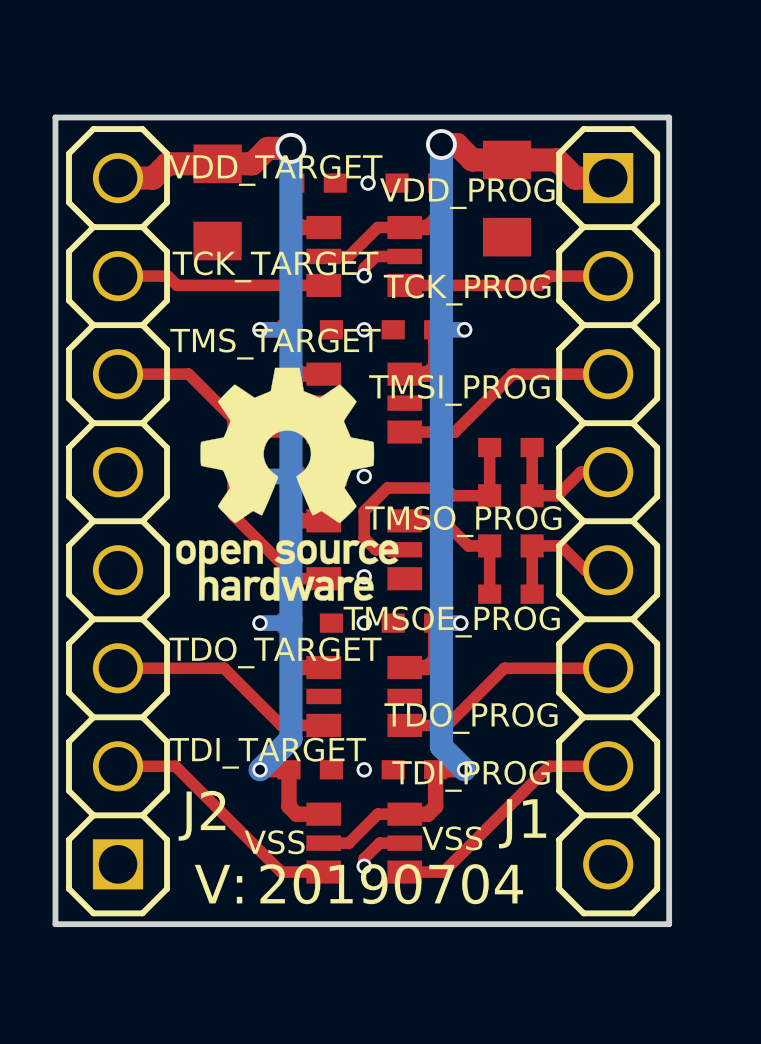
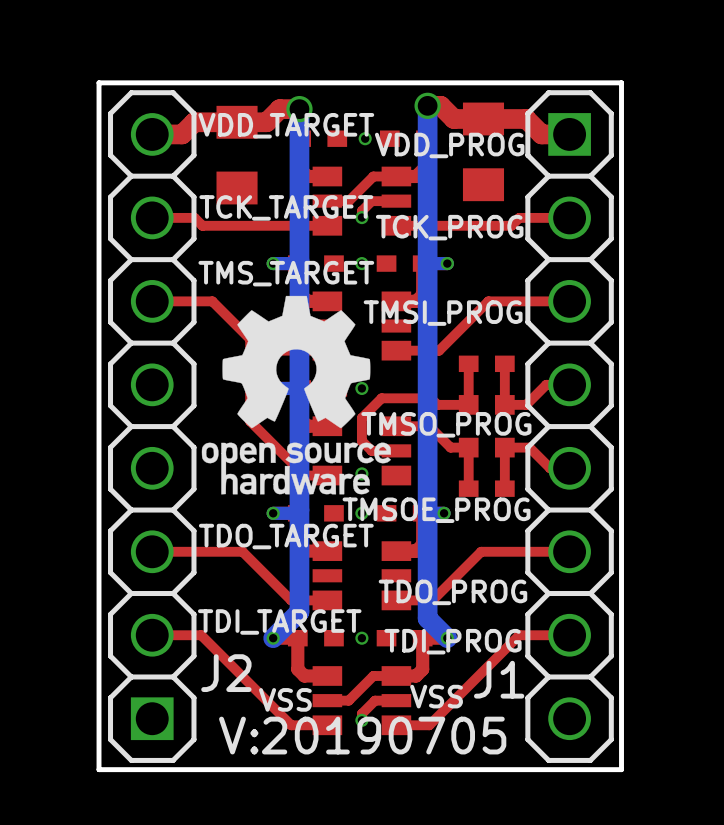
drawing shape: [194, 864, 524, 905] -> [219, 716, 507, 755]

